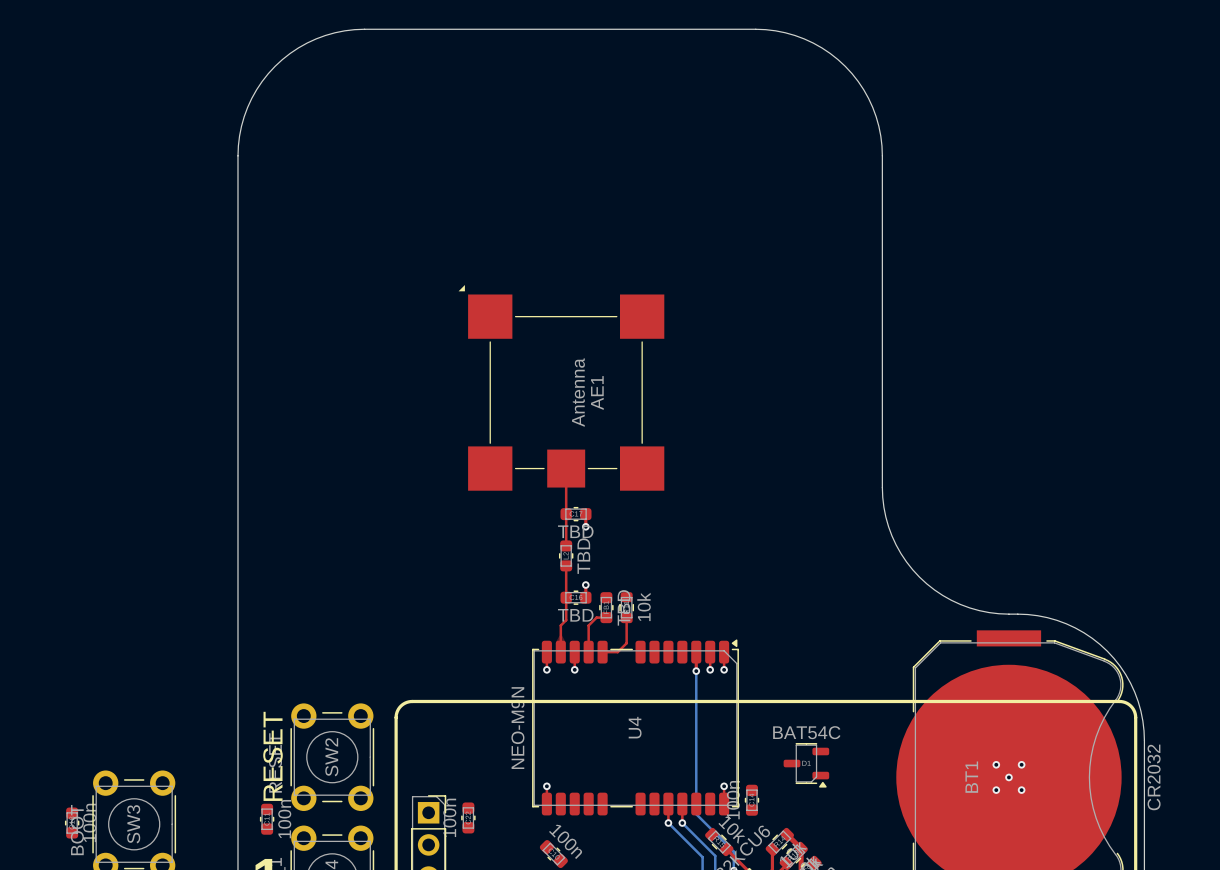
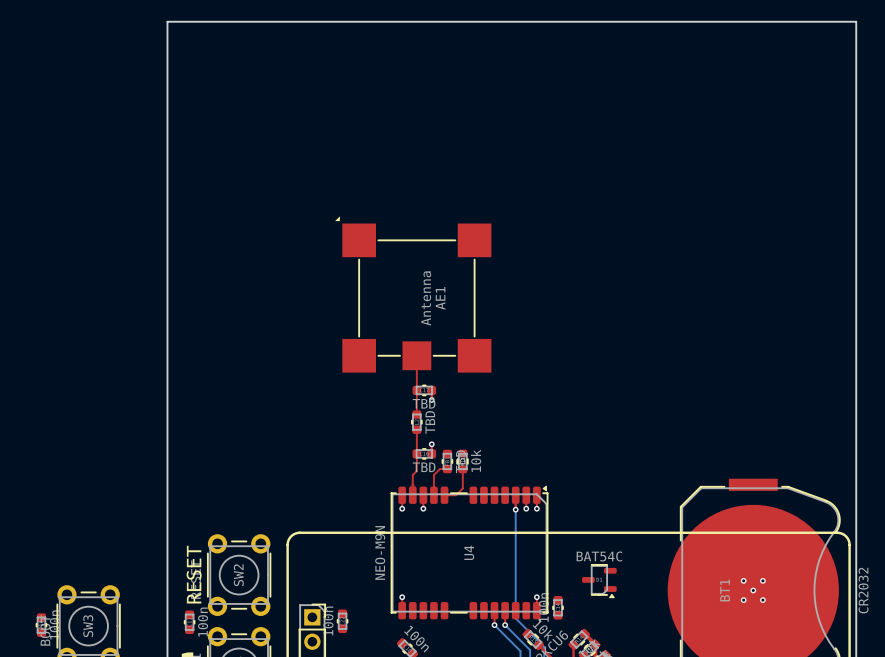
board edge: (237, 155) (239, 136) (244, 116) (256, 89) (268, 73) (282, 59) (298, 47) (316, 38) (344, 30) (755, 29) (785, 32) (804, 38) (821, 47) (837, 59) (858, 81) (872, 107) (880, 136) (882, 487) (885, 517) (896, 545) (906, 561) (919, 577) (934, 589) (951, 600) (969, 607) (989, 612) (1027, 614) (1056, 620) (1083, 632) (1100, 644) (1120, 666) (1134, 692) (1142, 720) (1144, 740) -> (167, 118) (167, 21) (856, 21) (856, 562)

